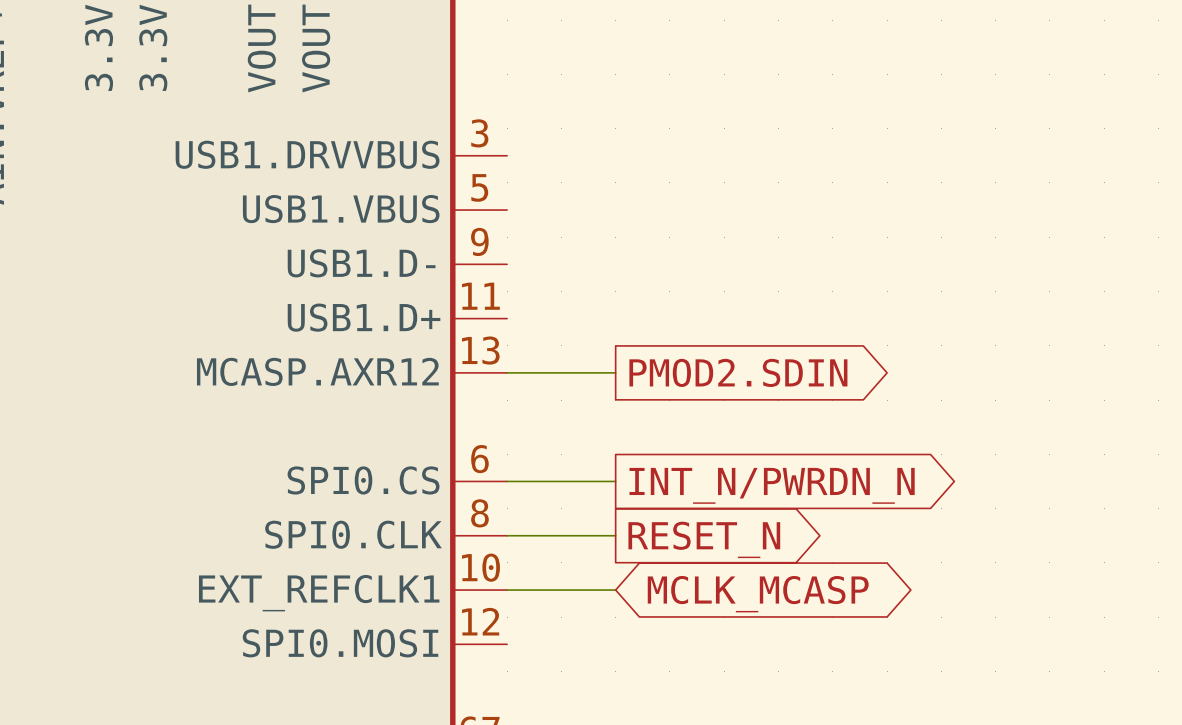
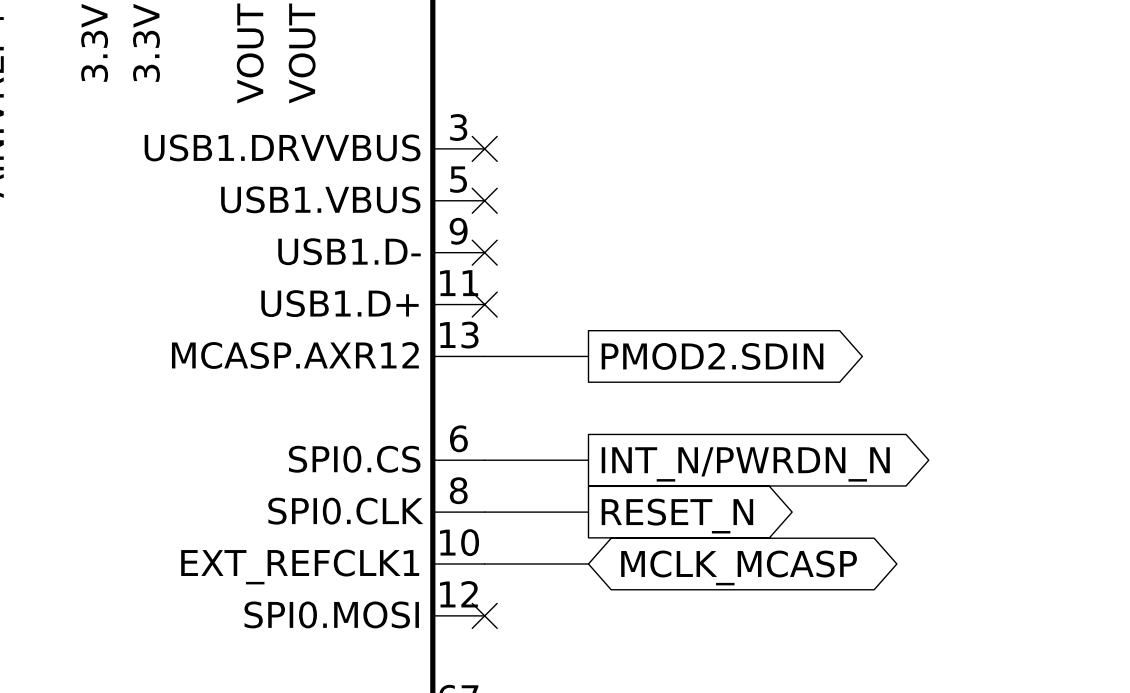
no-connect mark: none -> (484, 148)
no-connect mark: none -> (484, 200)
no-connect mark: none -> (484, 252)
no-connect mark: none -> (484, 304)
no-connect mark: none -> (484, 615)

